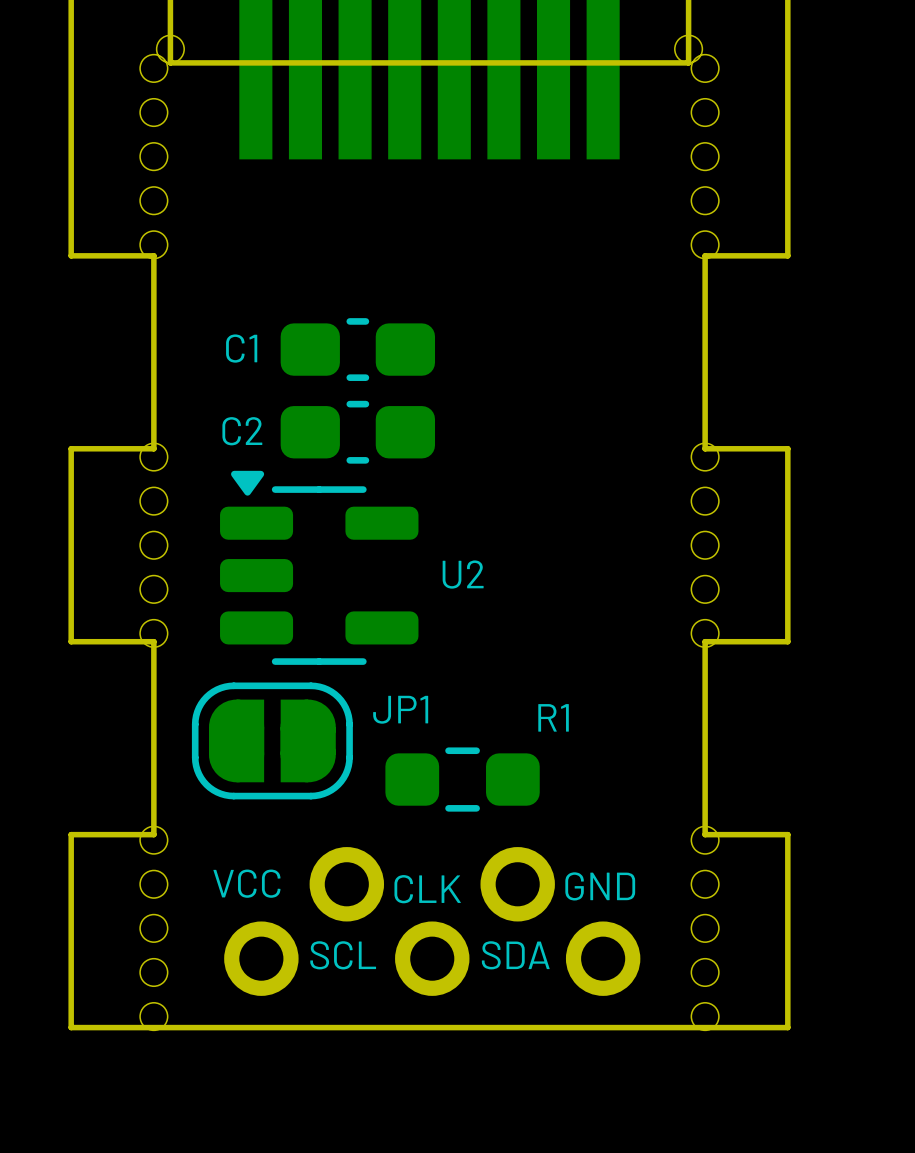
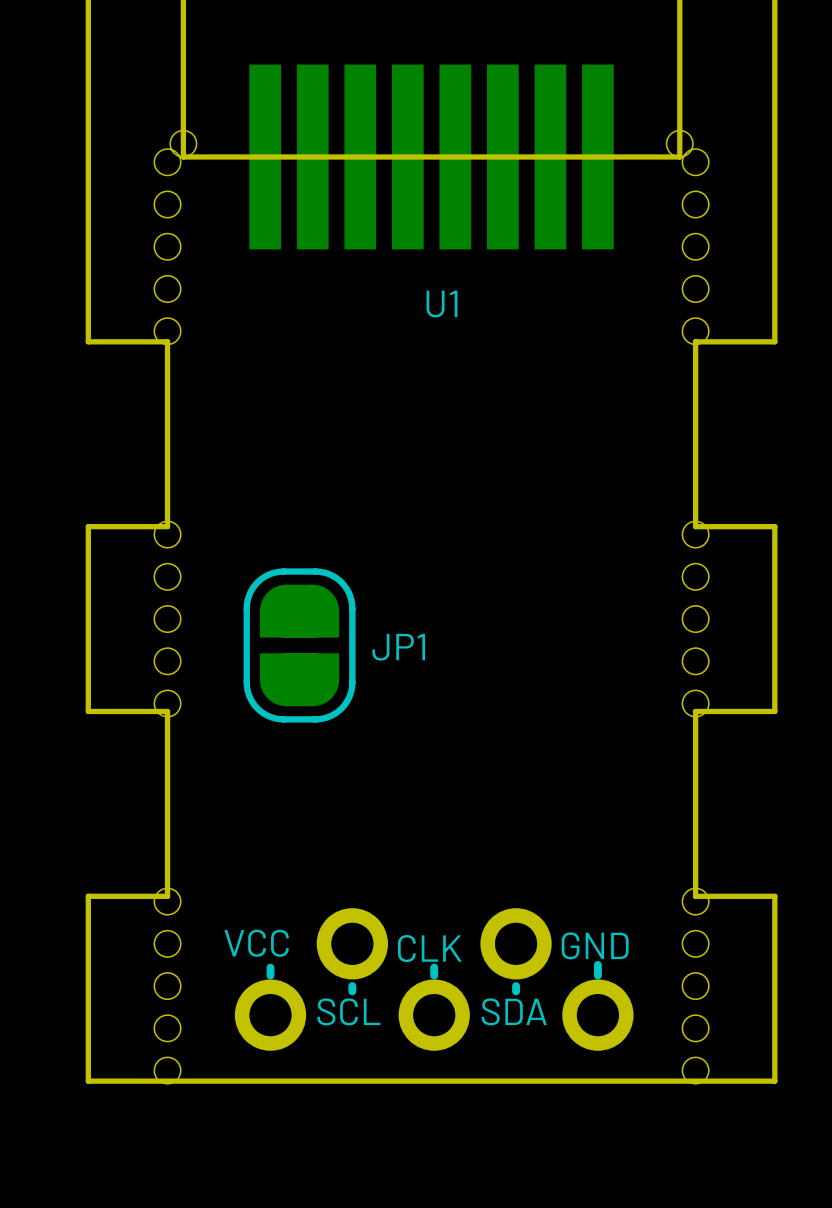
U1 name: none -> U1 (442, 304)
C1: (357, 349) -> none
C2: (357, 432) -> none
U2: (319, 567) -> none
JP1 rotation: 0° (272, 740) -> 90° clockwise (299, 645)
JP1 position: (272, 740) -> (299, 645)
R1: (462, 779) -> none
line: none -> (597, 964) (597, 975)
line: none -> (270, 967) (270, 975)
line: none -> (434, 967) (434, 975)
line: none -> (352, 986) (352, 991)
line: none -> (516, 986) (516, 991)

